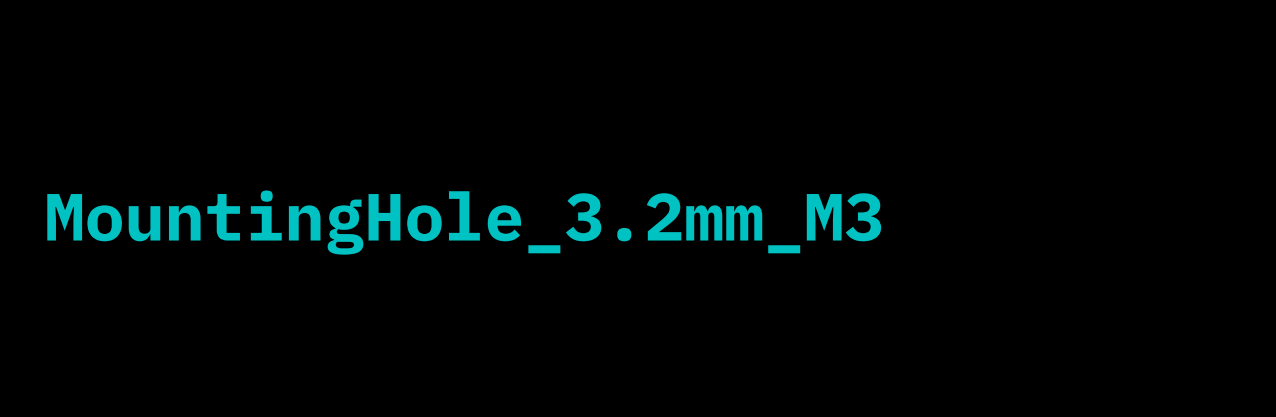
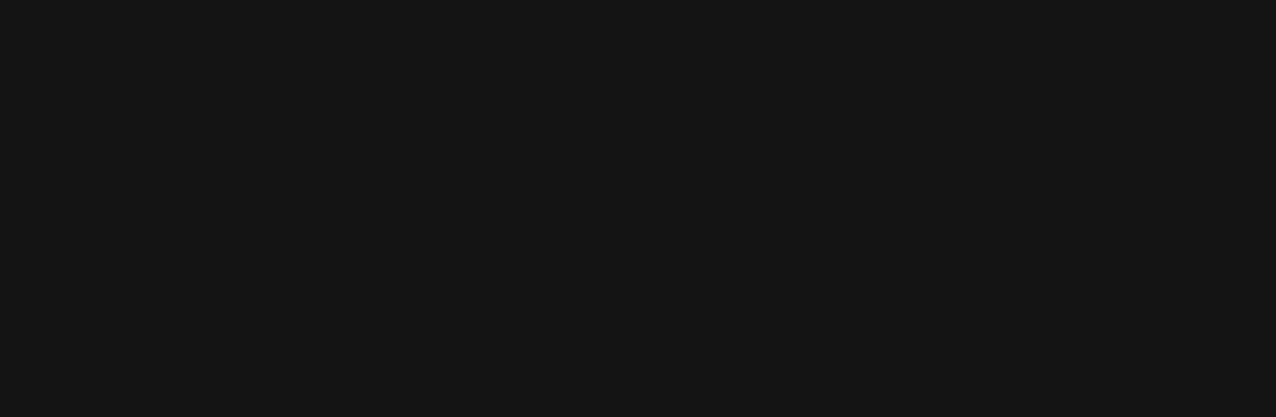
text: MountingHole_3.2mm_M3 (464, 222) -> none

